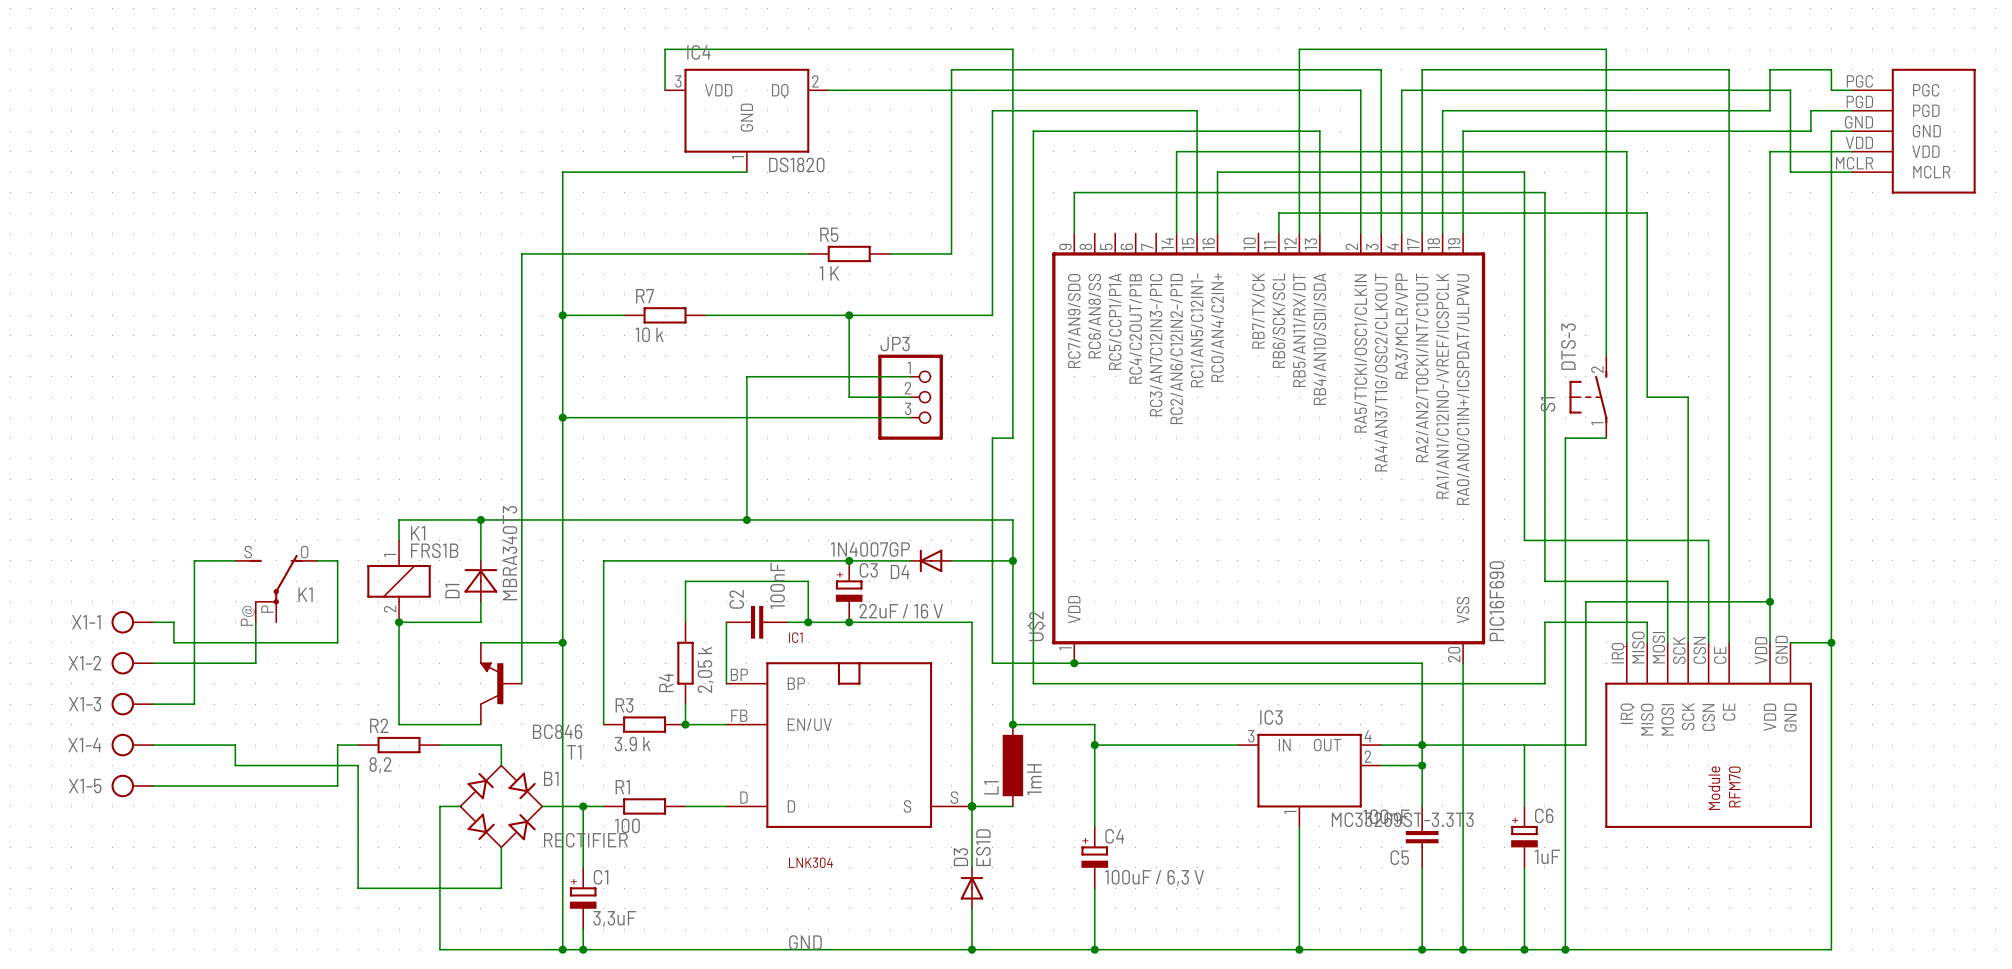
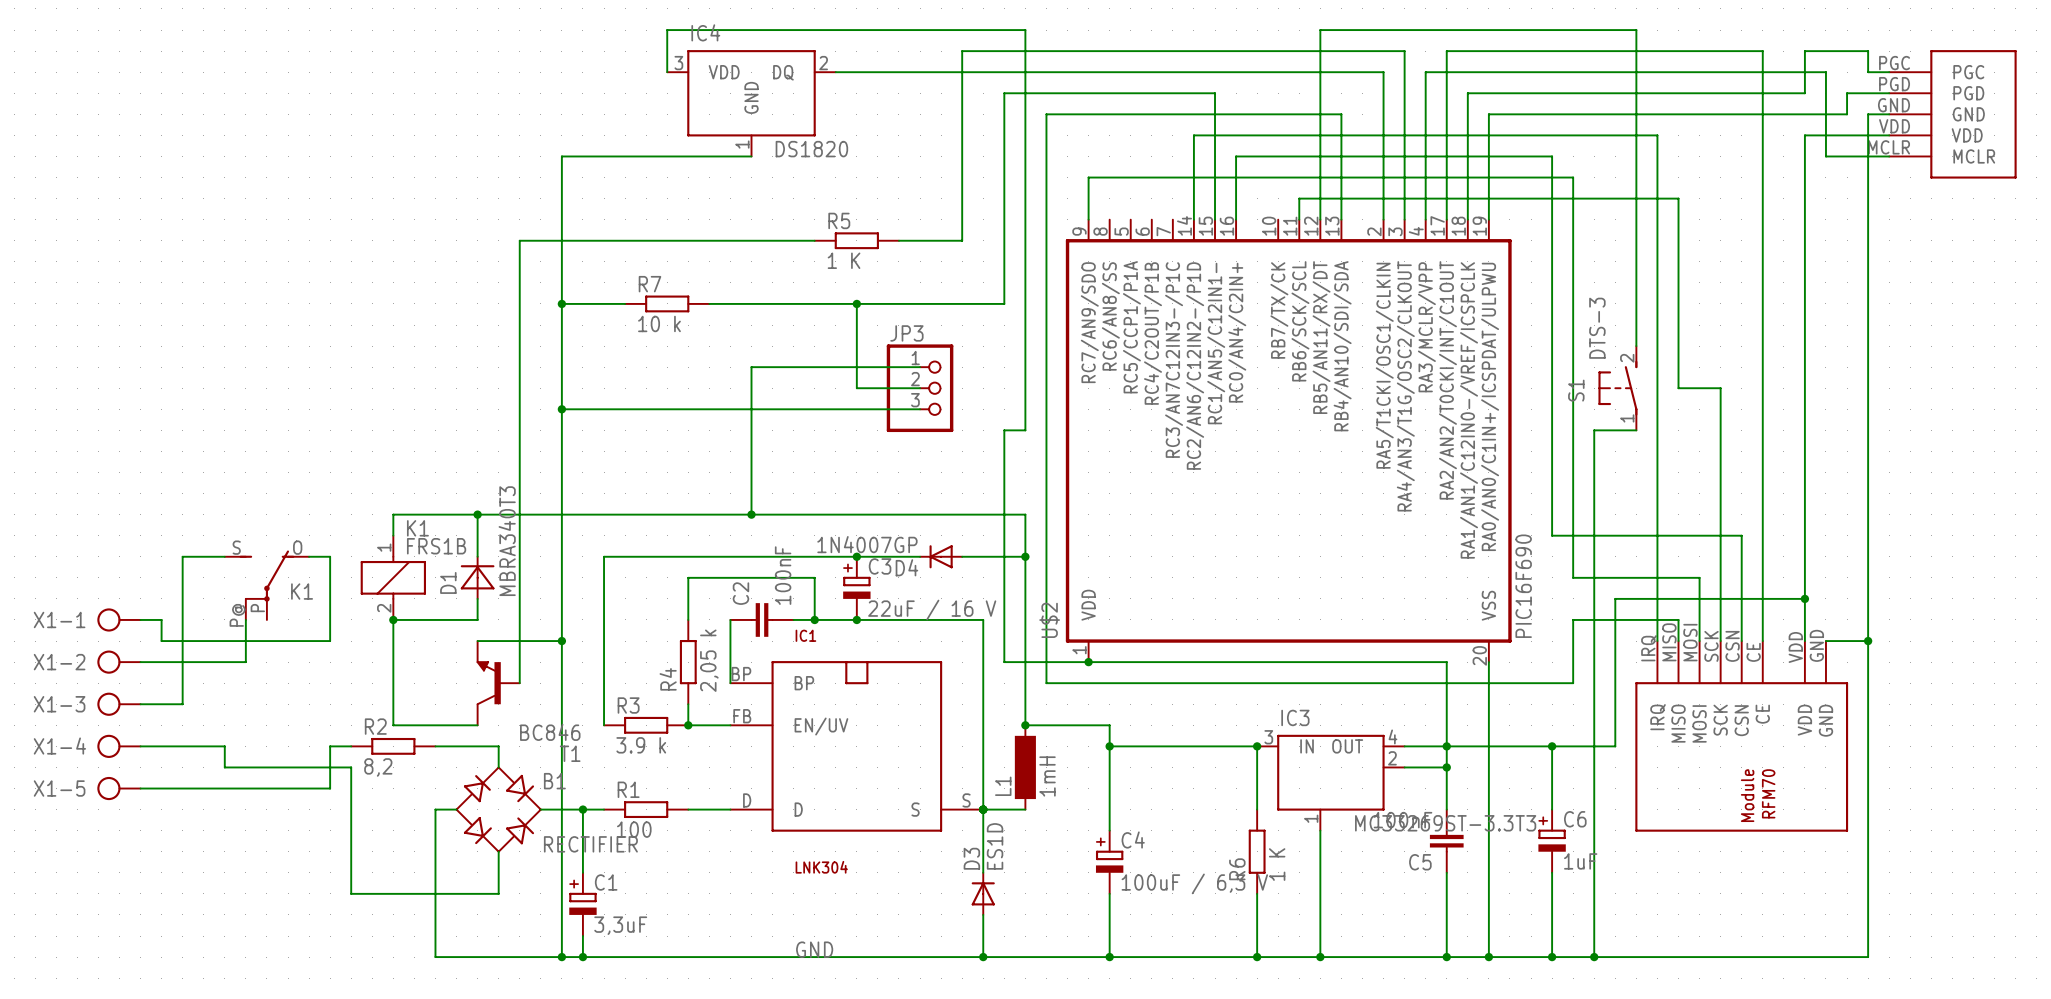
wire: none -> (1257, 746) (1257, 809)
junction: none -> (1257, 746)
junction: none -> (1552, 746)
R6: none -> 1 K (1257, 851)
wire: none -> (1257, 893) (1257, 957)
junction: none -> (1257, 957)

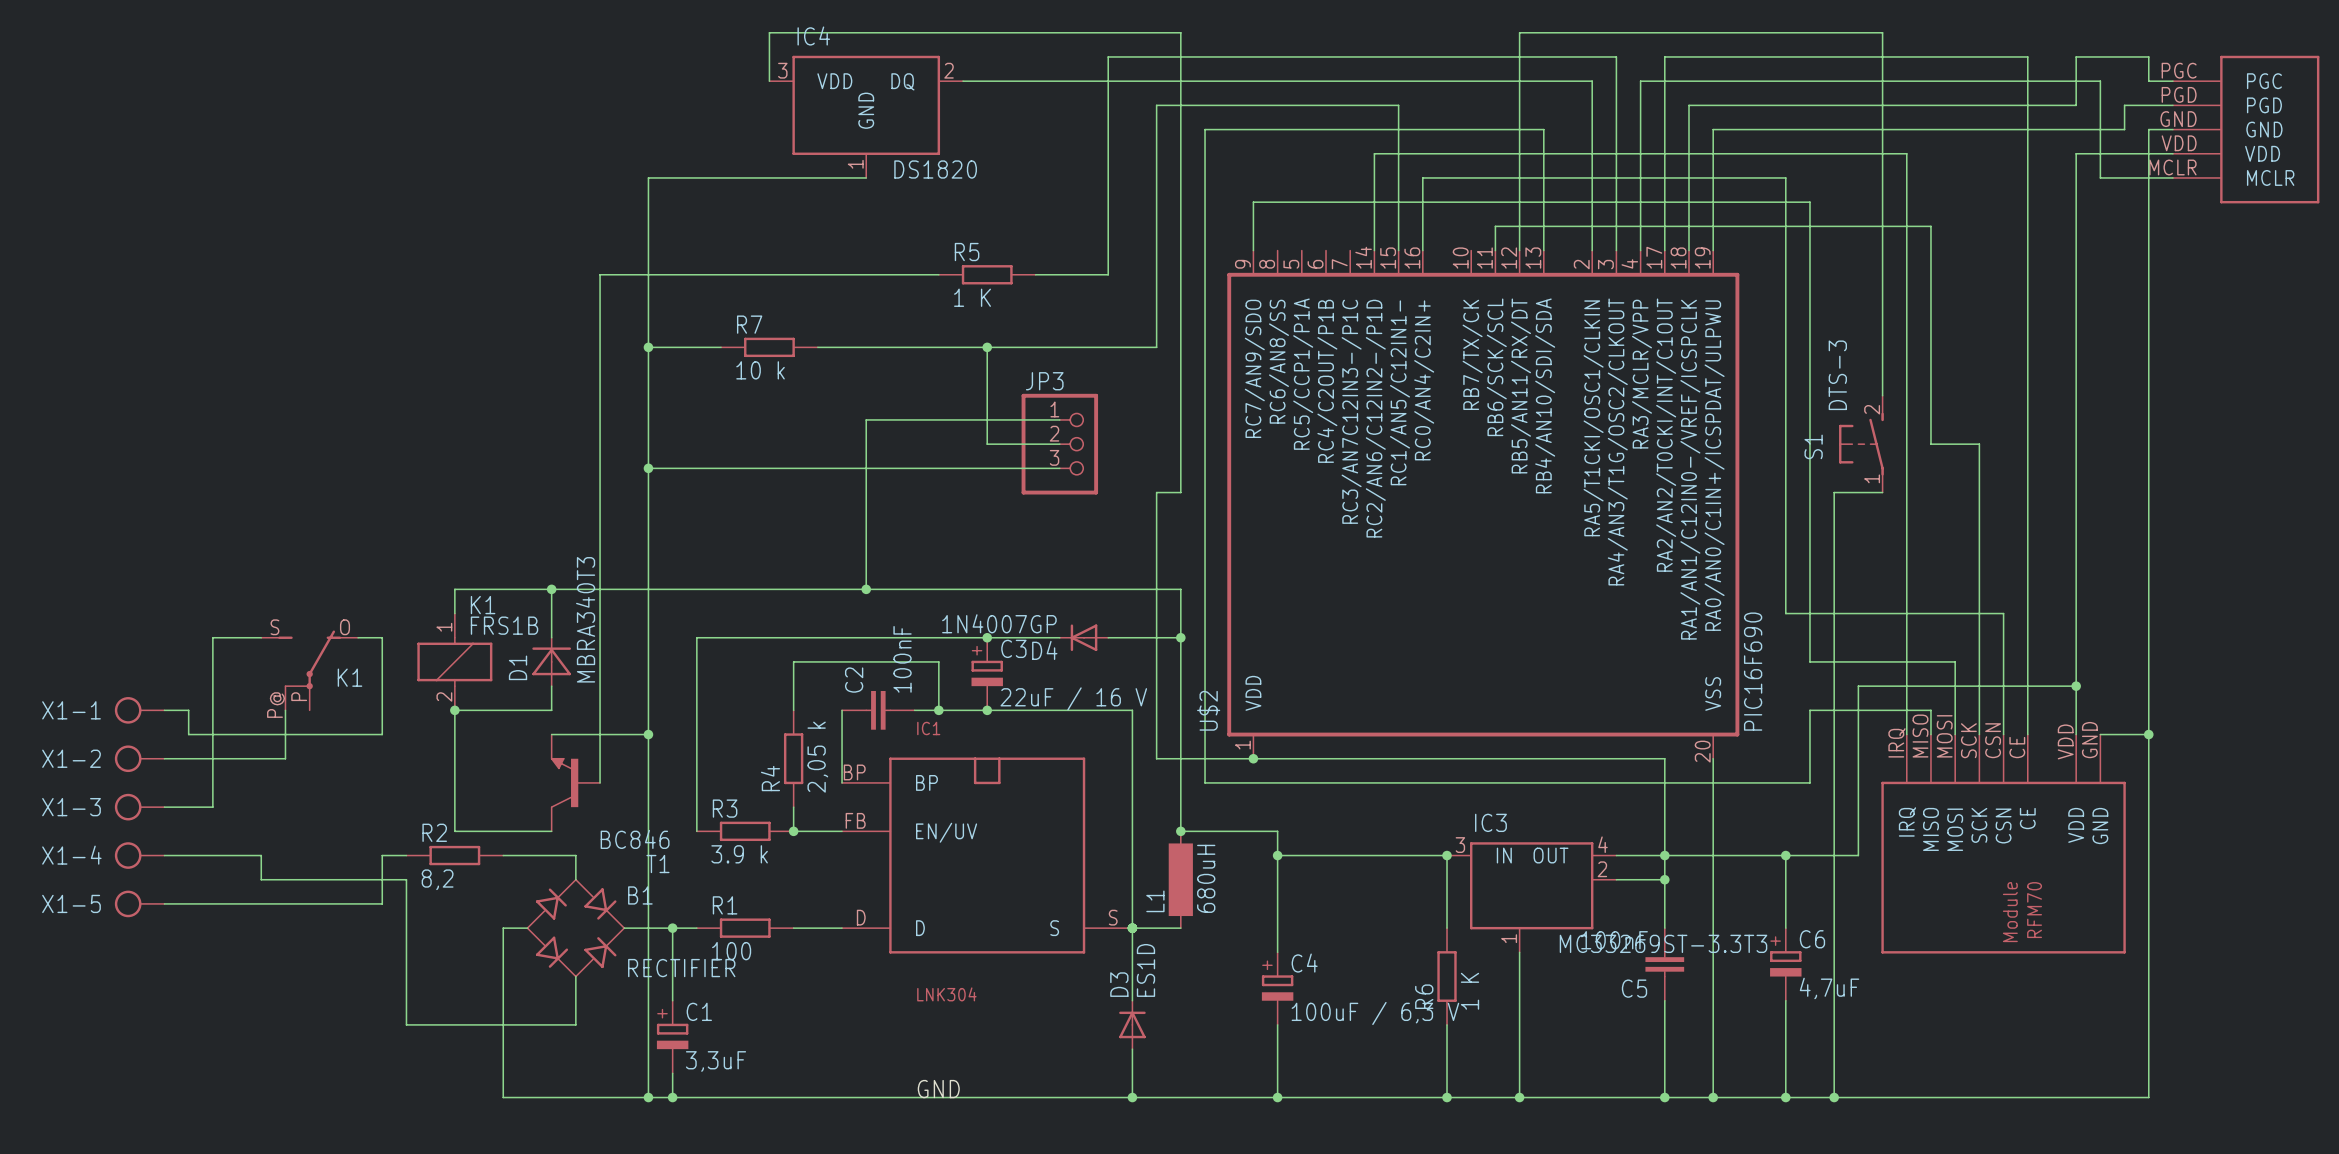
L1 value: 1mH (1047, 776) -> 680uH (1206, 878)
C6 value: 1uF (1580, 861) -> 4,7uF (1829, 988)

